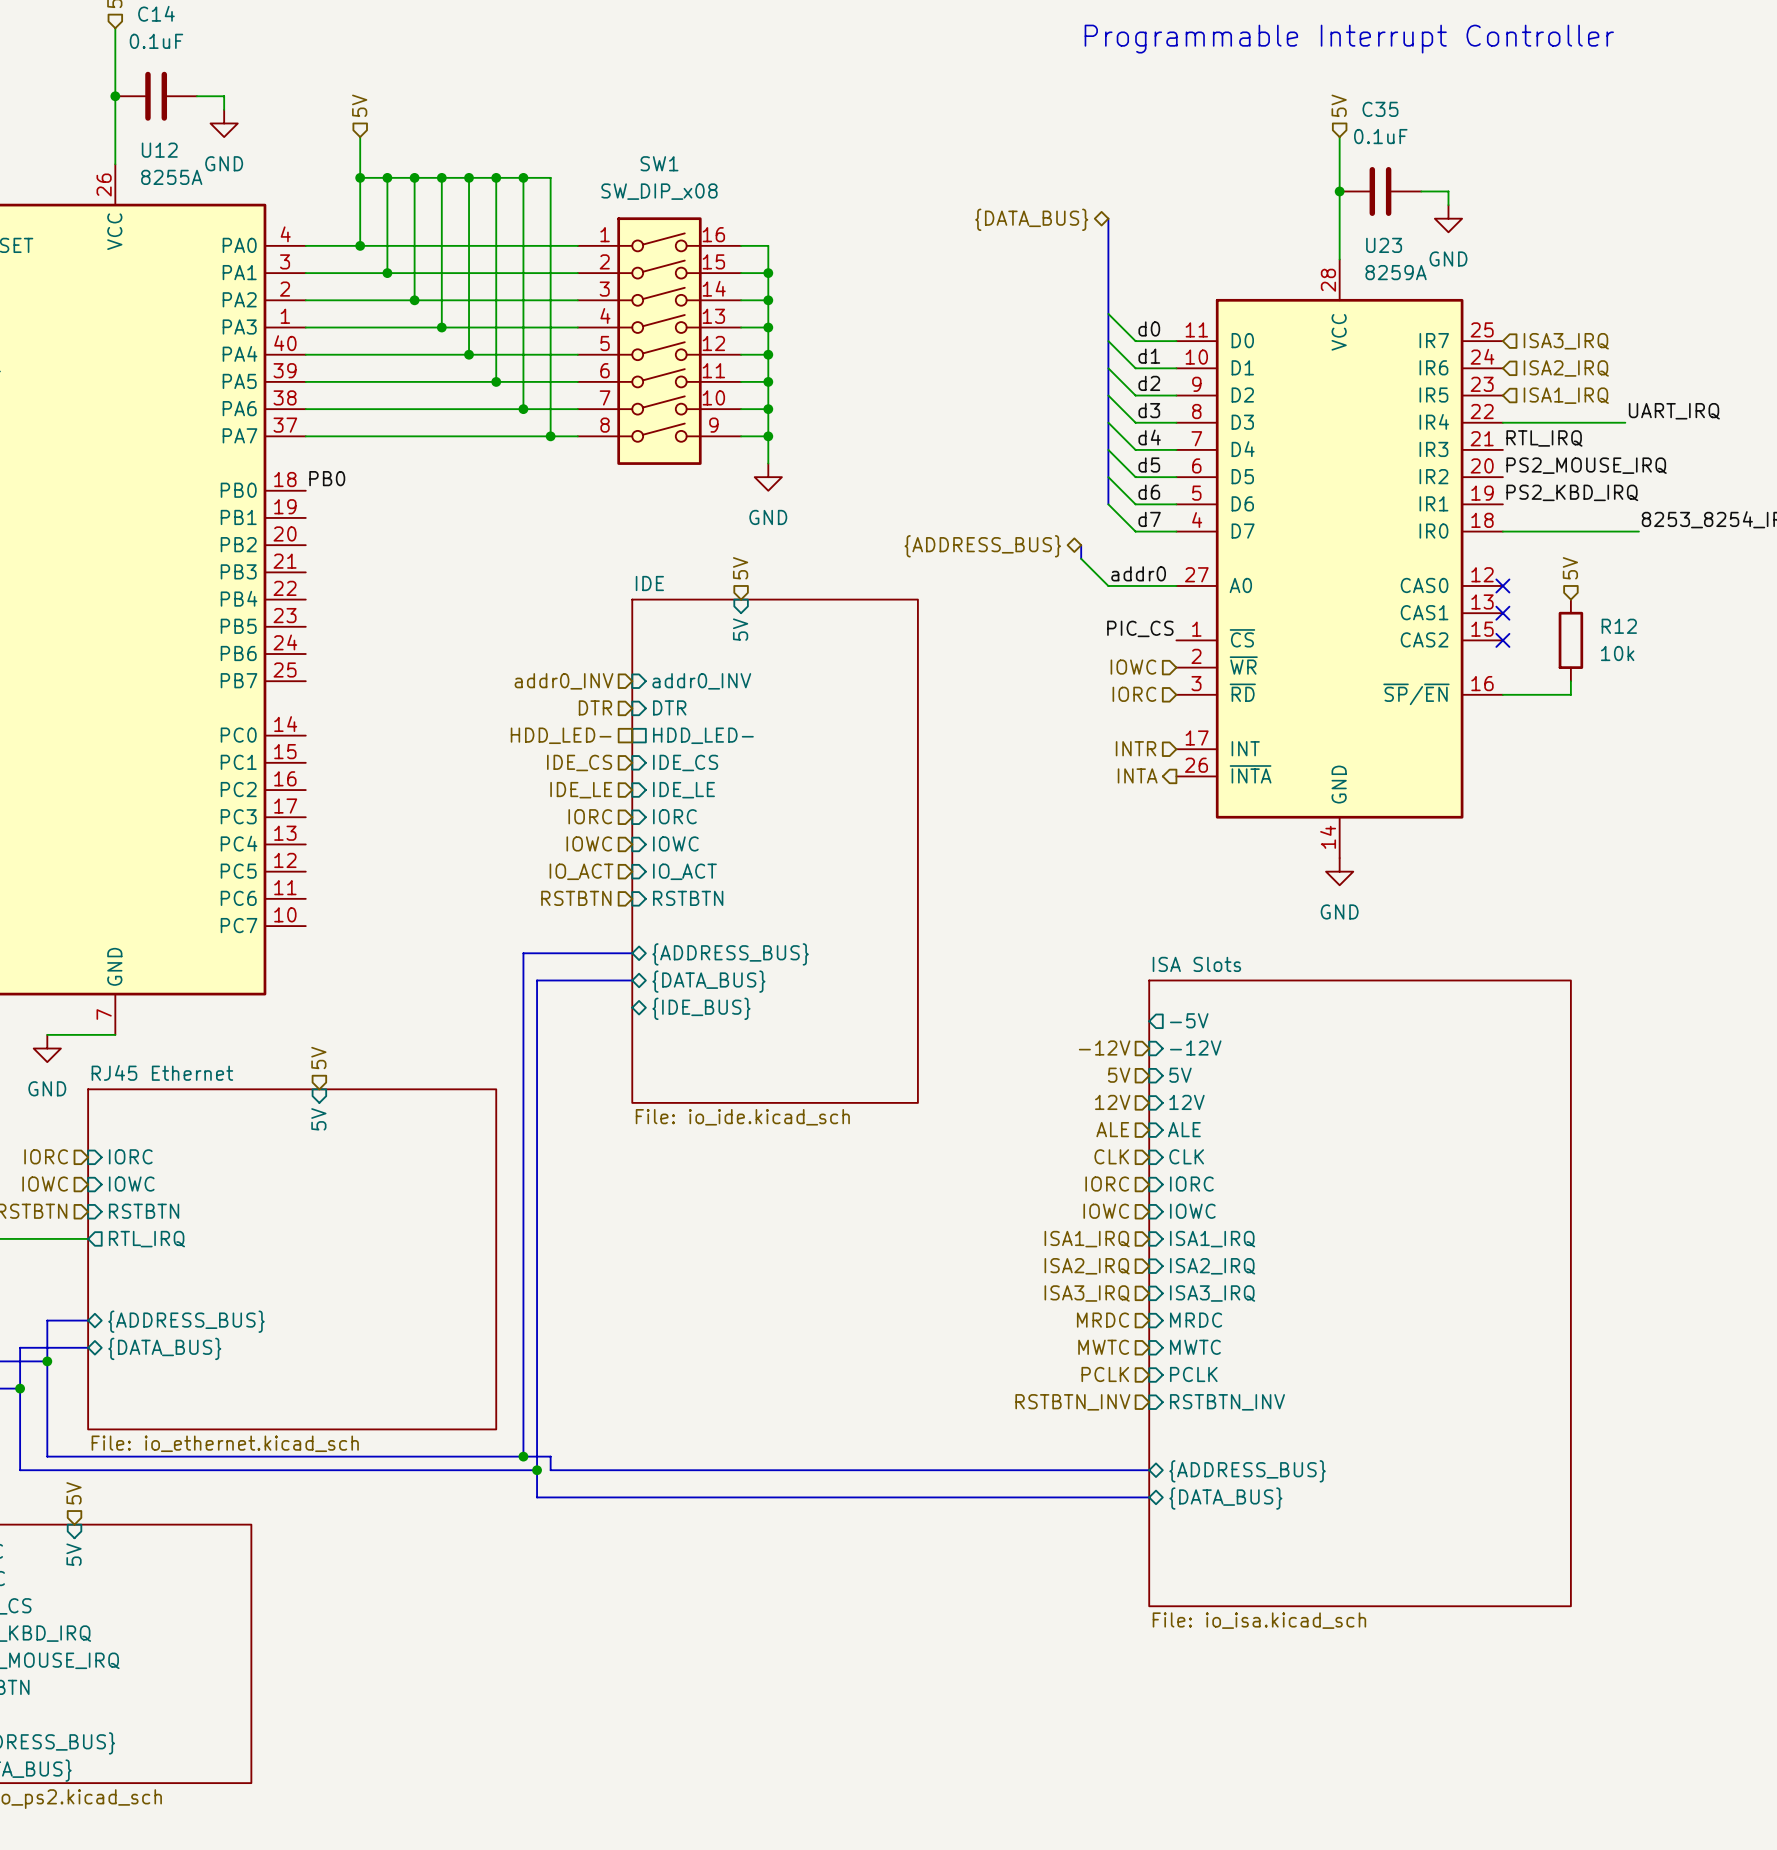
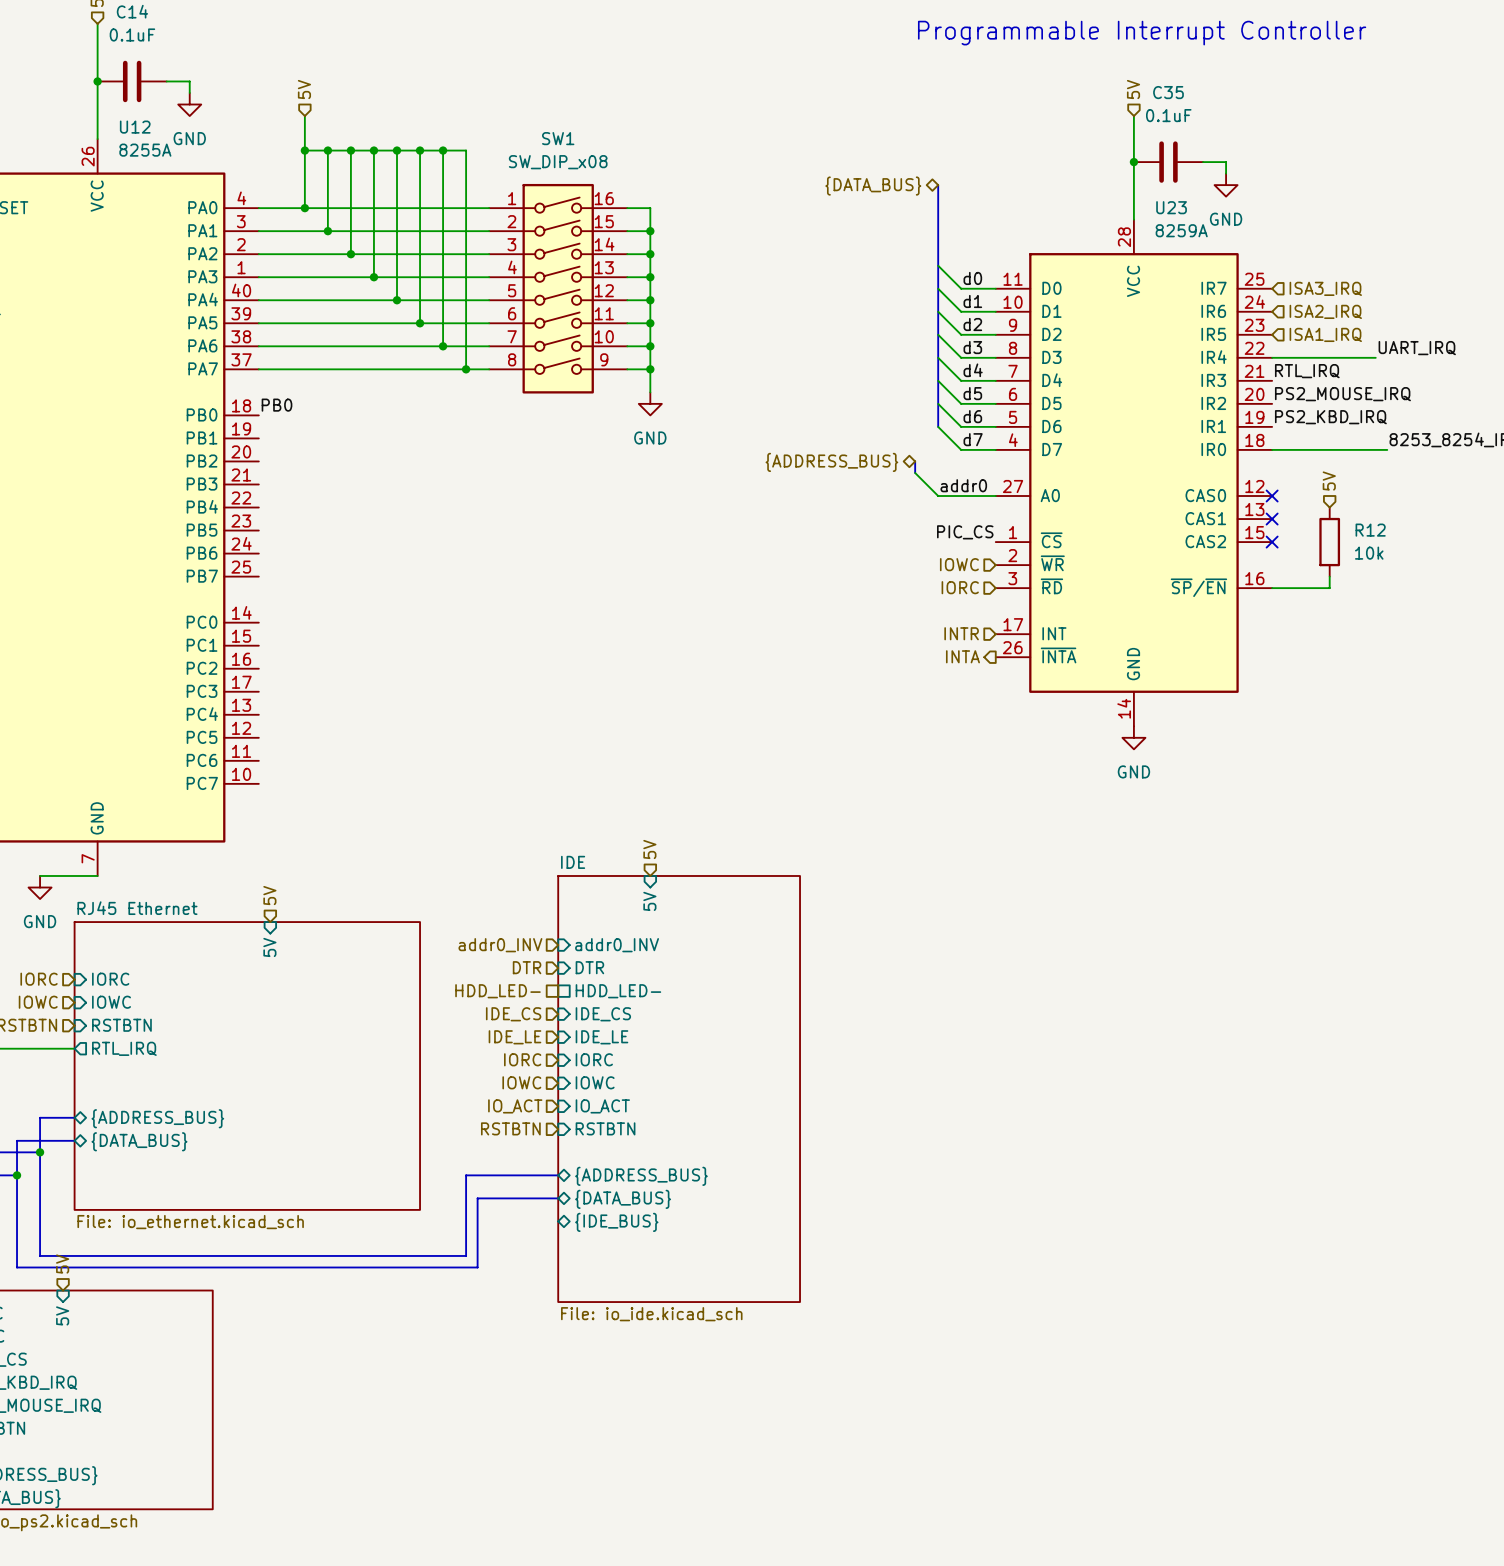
hierarchical label: 5V (740, 568) -> none
sheet pin: 5V (740, 629) -> none
hierarchical label: addr0_INV (564, 681) -> none
sheet pin: addr0_INV (701, 681) -> none
hierarchical label: DTR (595, 707) -> none
sheet pin: DTR (669, 707) -> none
hierarchical label: HDD_LED- (561, 735) -> none
sheet pin: HDD_LED- (703, 735) -> none
hierarchical label: IDE_CS (579, 762) -> none
sheet pin: IDE_CS (685, 762) -> none
hierarchical label: IDE_LE (581, 790) -> none
sheet pin: IDE_LE (683, 790) -> none
hierarchical label: IORC (590, 816) -> none
sheet pin: IORC (674, 816) -> none
hierarchical label: IOWC (589, 843) -> none
sheet pin: IOWC (675, 843) -> none
sheet IDE: File: io_ide.kicad_sch (775, 851) -> none
hierarchical label: IO_ACT (581, 871) -> none
sheet pin: IO_ACT (684, 871) -> none
hierarchical label: RSTBTN (576, 898) -> none
sheet pin: RSTBTN (688, 898) -> none
bus: (632, 953) (523, 953) (523, 1456) -> none
sheet pin: {ADDRESS_BUS} (730, 954) -> none
bus: (632, 980) (537, 980) (537, 1497) -> none
sheet pin: {DATA_BUS} (708, 981) -> none
hierarchical label: none -> 5V (649, 849)
sheet pin: {IDE_BUS} (701, 1008) -> none
sheet pin: -5V (1189, 1020) -> none
hierarchical label: -12V (1104, 1048) -> none
sheet pin: -12V (1195, 1048) -> none
sheet pin: none -> 5V (649, 901)
hierarchical label: 5V (1119, 1075) -> none
sheet pin: 5V (1180, 1075) -> none
hierarchical label: 12V (1112, 1102) -> none
sheet pin: 12V (1186, 1102) -> none
hierarchical label: none -> addr0_INV (500, 945)
sheet pin: none -> addr0_INV (617, 945)
hierarchical label: ALE (1112, 1129) -> none
sheet pin: ALE (1184, 1129) -> none
hierarchical label: none -> DTR (527, 967)
sheet pin: none -> DTR (589, 967)
hierarchical label: CLK (1111, 1156) -> none
sheet pin: CLK (1186, 1156) -> none
hierarchical label: none -> HDD_LED- (497, 991)
sheet pin: none -> HDD_LED- (618, 991)
hierarchical label: IORC (1107, 1184) -> none
sheet pin: IORC (1191, 1184) -> none
hierarchical label: none -> IDE_CS (513, 1014)
sheet pin: none -> IDE_CS (603, 1014)
hierarchical label: IOWC (1106, 1211) -> none
sheet pin: IOWC (1192, 1211) -> none
hierarchical label: none -> IDE_LE (514, 1037)
sheet pin: none -> IDE_LE (601, 1037)
hierarchical label: ISA1_IRQ (1087, 1239) -> none
sheet pin: ISA1_IRQ (1212, 1239) -> none
hierarchical label: none -> IORC (522, 1059)
sheet pin: none -> IORC (594, 1059)
hierarchical label: ISA2_IRQ (1087, 1266) -> none
sheet pin: ISA2_IRQ (1212, 1266) -> none
hierarchical label: none -> IOWC (521, 1082)
sheet pin: none -> IOWC (595, 1082)
sheet IDE: none -> File: io_ide.kicad_sch (679, 1089)
hierarchical label: ISA3_IRQ (1087, 1293) -> none
sheet pin: ISA3_IRQ (1212, 1293) -> none
sheet ISA Slots: File: io_isa.kicad_sch (1360, 1293) -> none
hierarchical label: none -> IO_ACT (515, 1106)
sheet pin: none -> IO_ACT (602, 1106)
hierarchical label: MRDC (1103, 1320) -> none
sheet pin: MRDC (1196, 1320) -> none
hierarchical label: none -> RSTBTN (510, 1128)
sheet pin: none -> RSTBTN (605, 1128)
hierarchical label: MWTC (1103, 1347) -> none
sheet pin: MWTC (1195, 1347) -> none
hierarchical label: PCLK (1105, 1374) -> none
sheet pin: PCLK (1193, 1374) -> none
bus: none -> (558, 1175) (466, 1175) (466, 1232)
sheet pin: none -> {ADDRESS_BUS} (641, 1176)
hierarchical label: RSTBTN_INV (1072, 1402) -> none
sheet pin: RSTBTN_INV (1227, 1402) -> none
sheet pin: none -> {DATA_BUS} (623, 1199)
sheet pin: none -> {IDE_BUS} (616, 1222)
bus: (47, 1456) (550, 1456) -> (40, 1232) (40, 1255) (466, 1255) (466, 1244)
junction: (523, 1456) -> none
bus: (20, 1470) (537, 1470) -> (17, 1244) (17, 1267) (454, 1267)
junction: (537, 1470) -> none
bus: (550, 1470) (1149, 1470) -> none
sheet pin: {ADDRESS_BUS} (1247, 1471) -> none
bus: (564, 1497) (1149, 1497) -> (477, 1267) (477, 1198) (558, 1198)
sheet pin: {DATA_BUS} (1225, 1498) -> none

